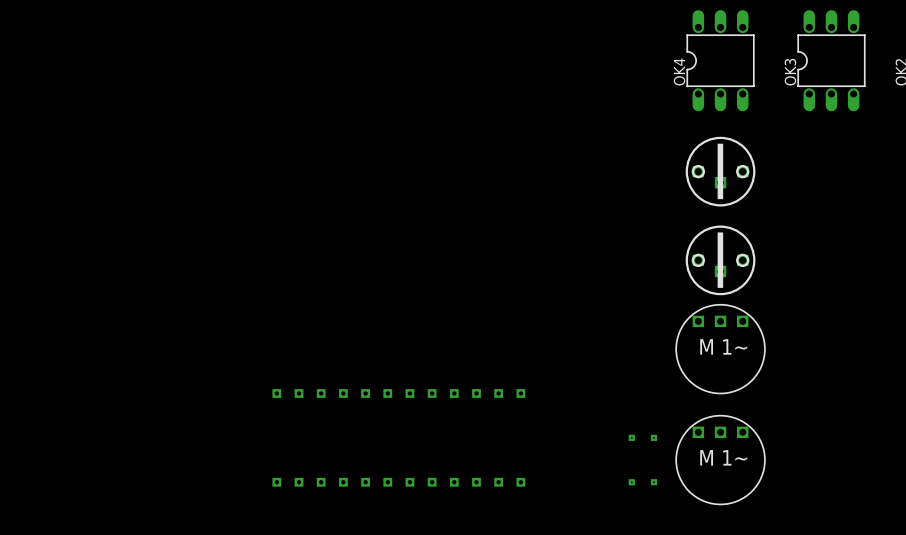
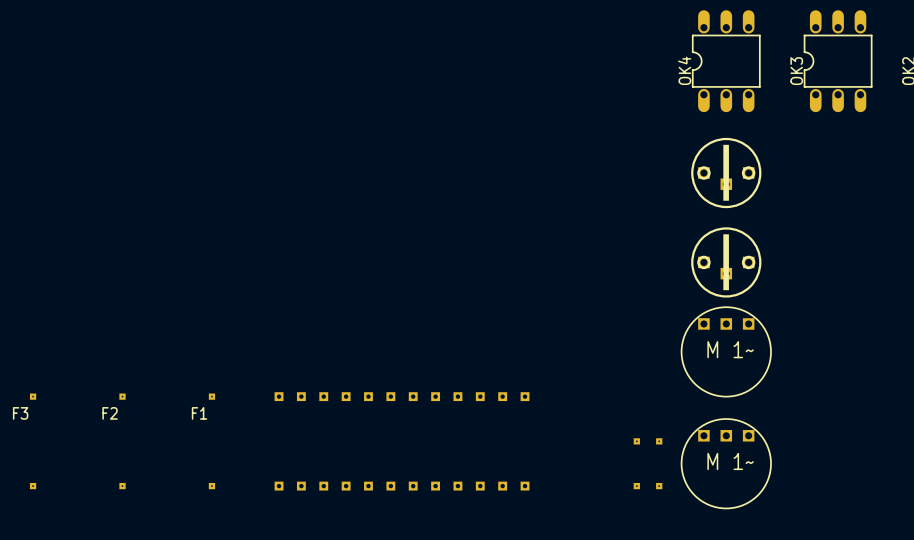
F3: none -> (33, 441)
F2: none -> (122, 441)
F1: none -> (211, 441)

